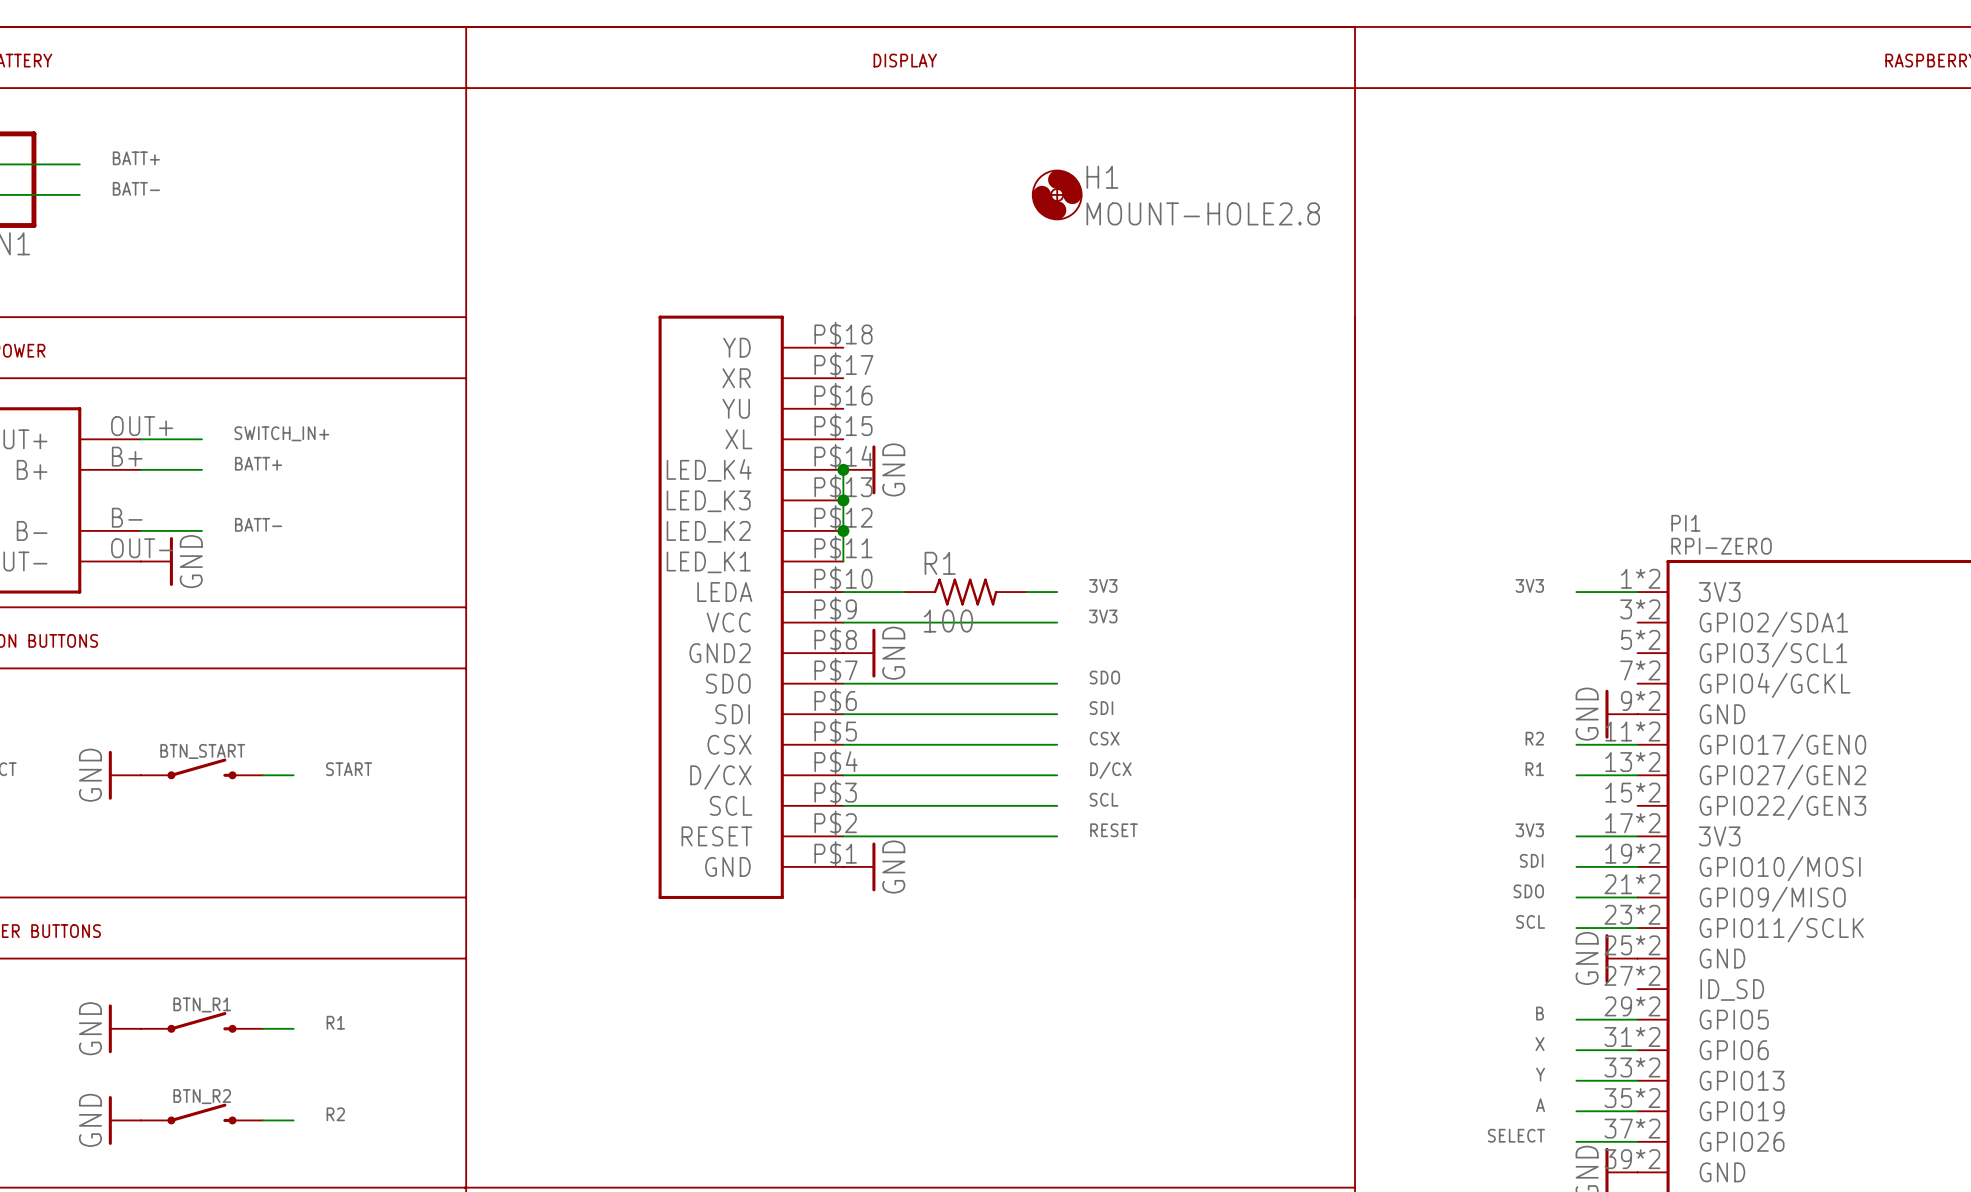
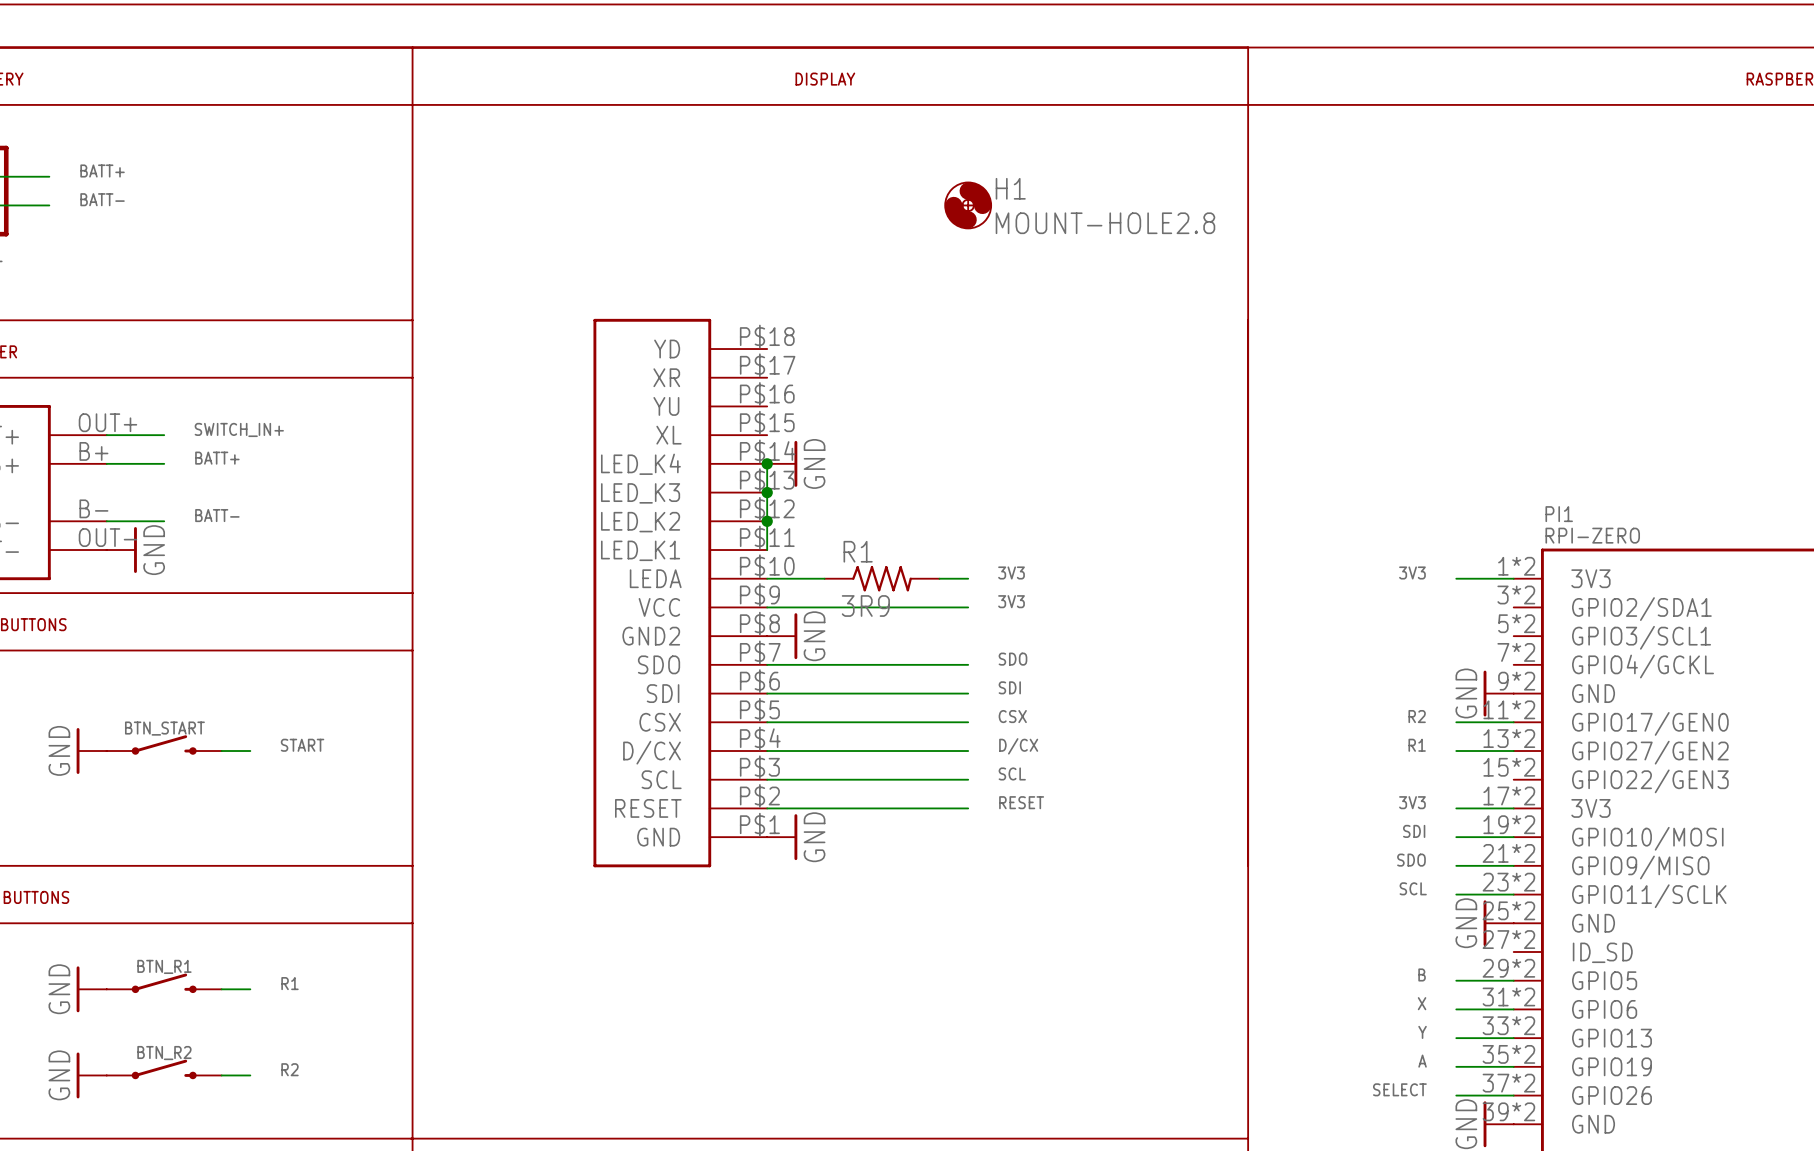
R1 value: 100 (948, 621) -> 3R9 (865, 606)

